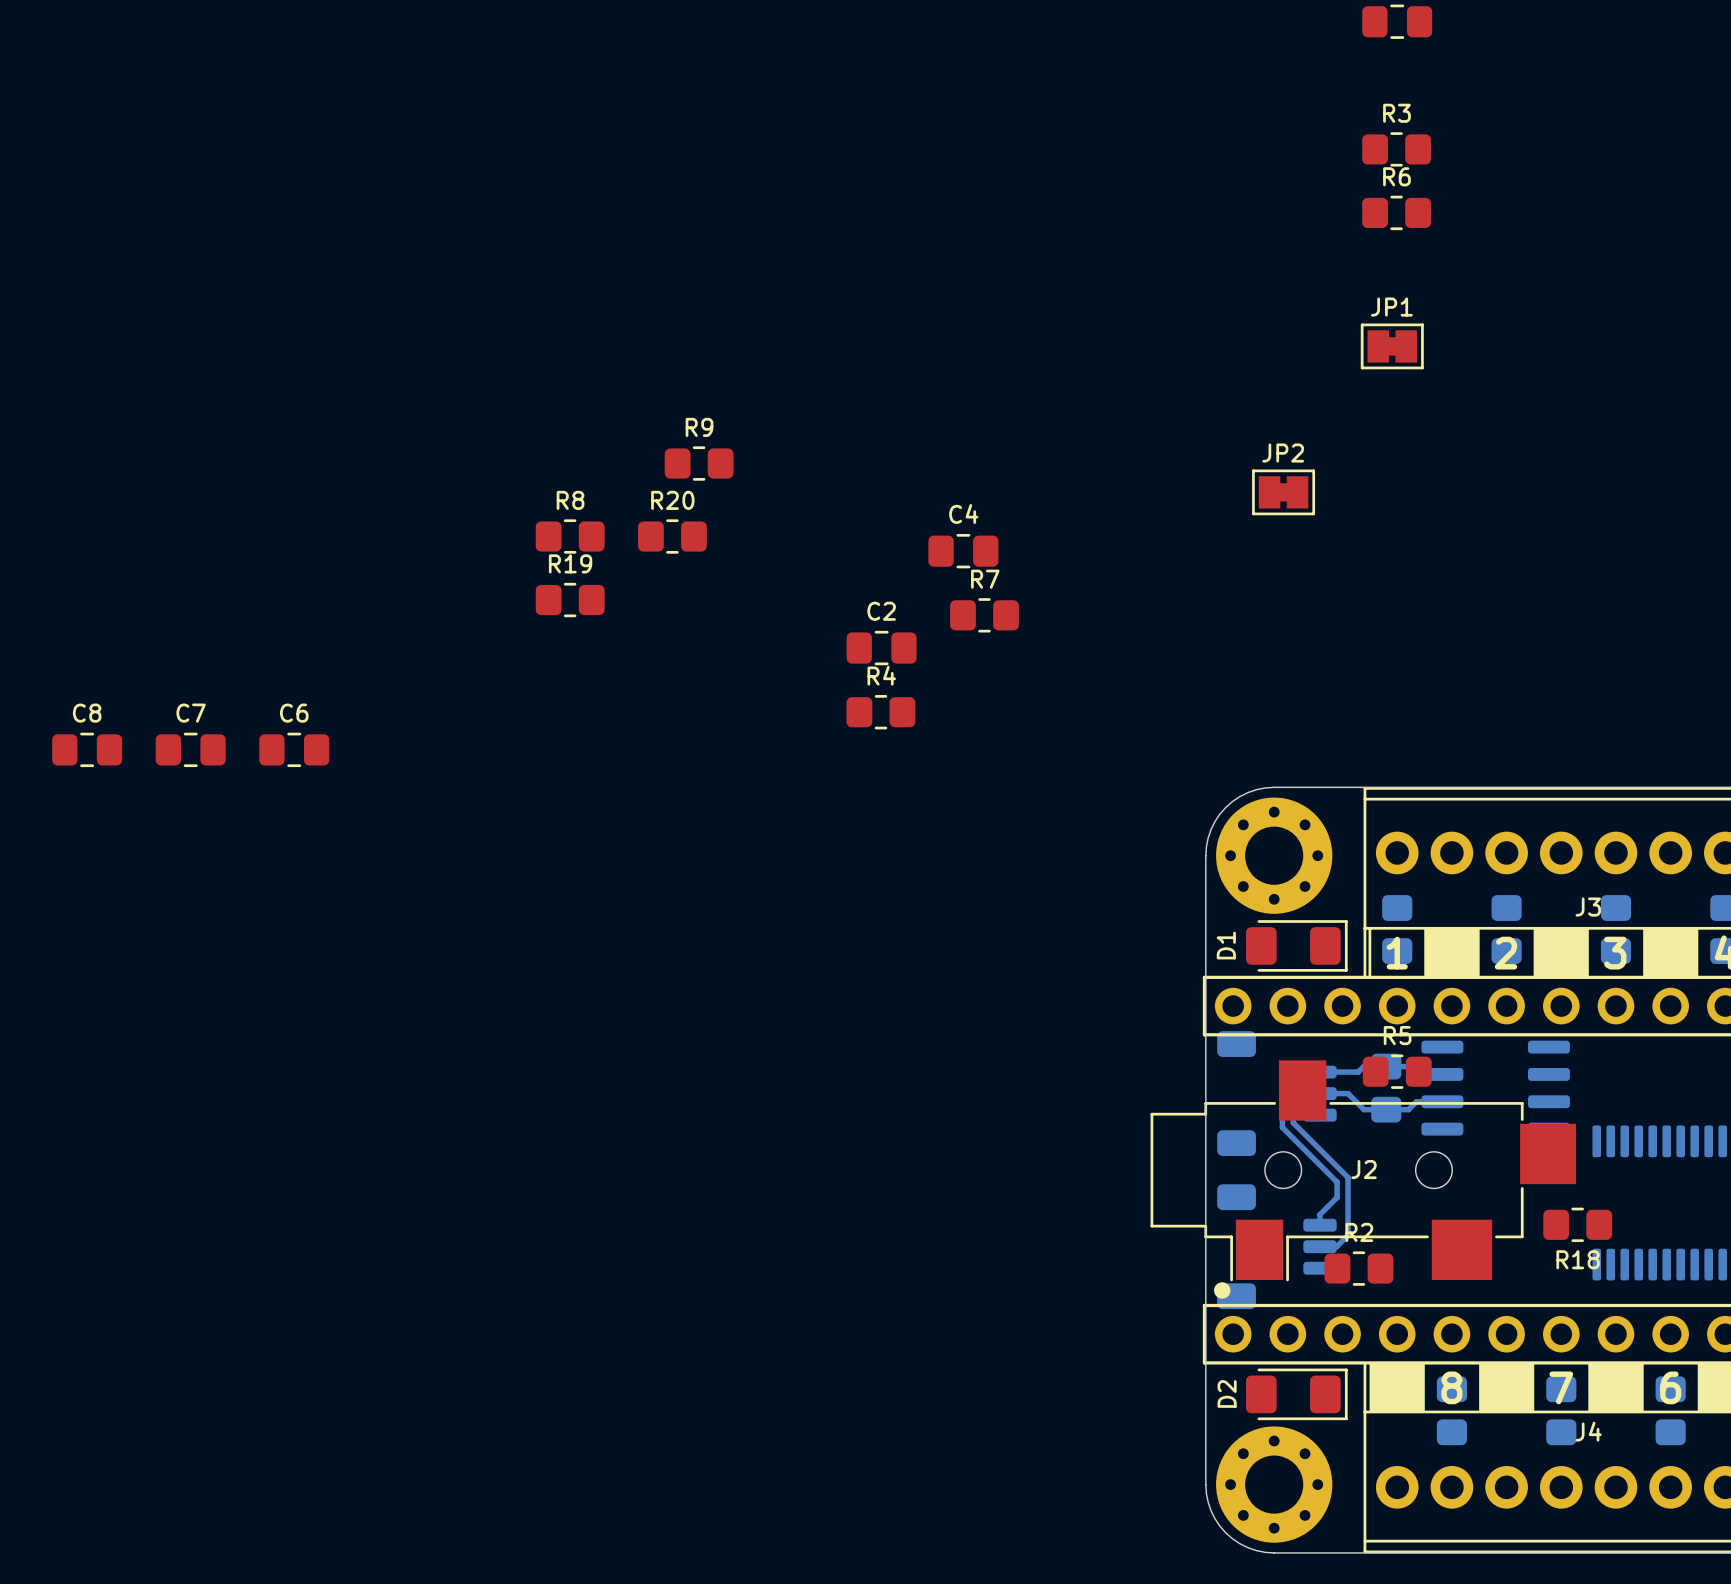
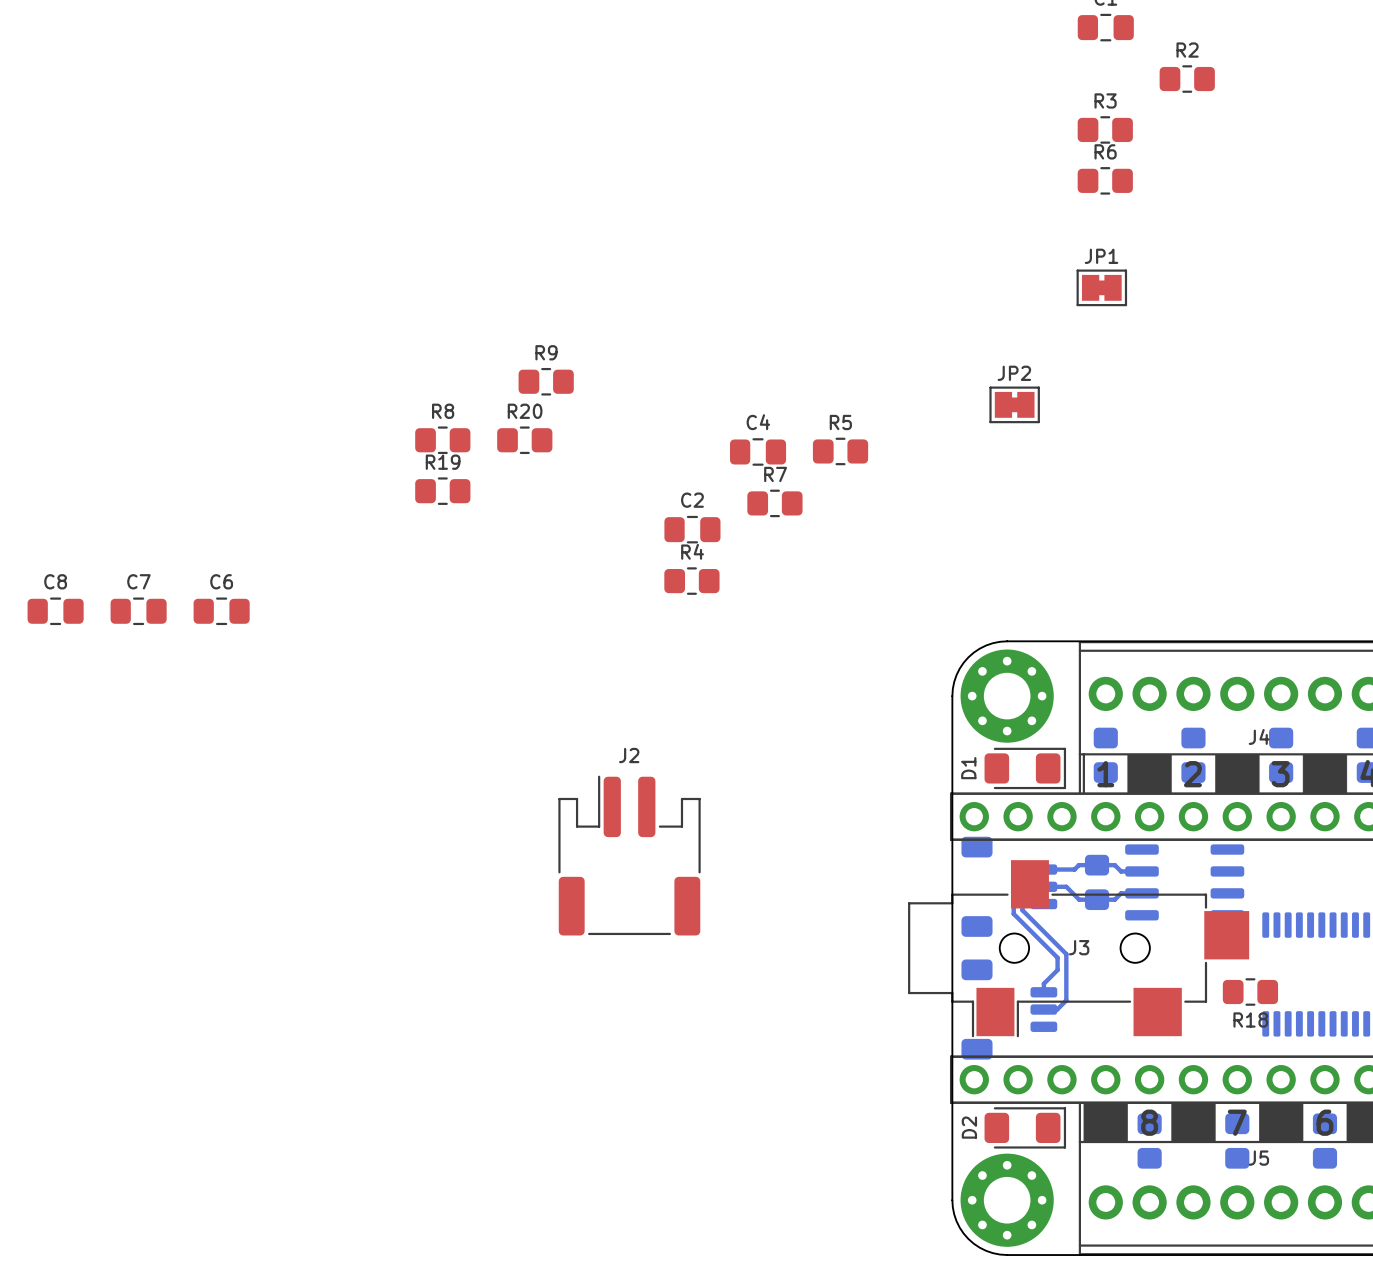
J3 name: J3 (1588, 907) -> J4 (1259, 736)
J2: none -> (629, 855)
R5 position: (1397, 1071) -> (840, 451)
J2 name: J2 (1364, 1169) -> J3 (1079, 947)
R2 position: (1358, 1268) -> (1187, 79)
drawing: [1214, 1282, 1231, 1299] -> none
J4 name: J4 (1588, 1431) -> J5 (1258, 1158)

